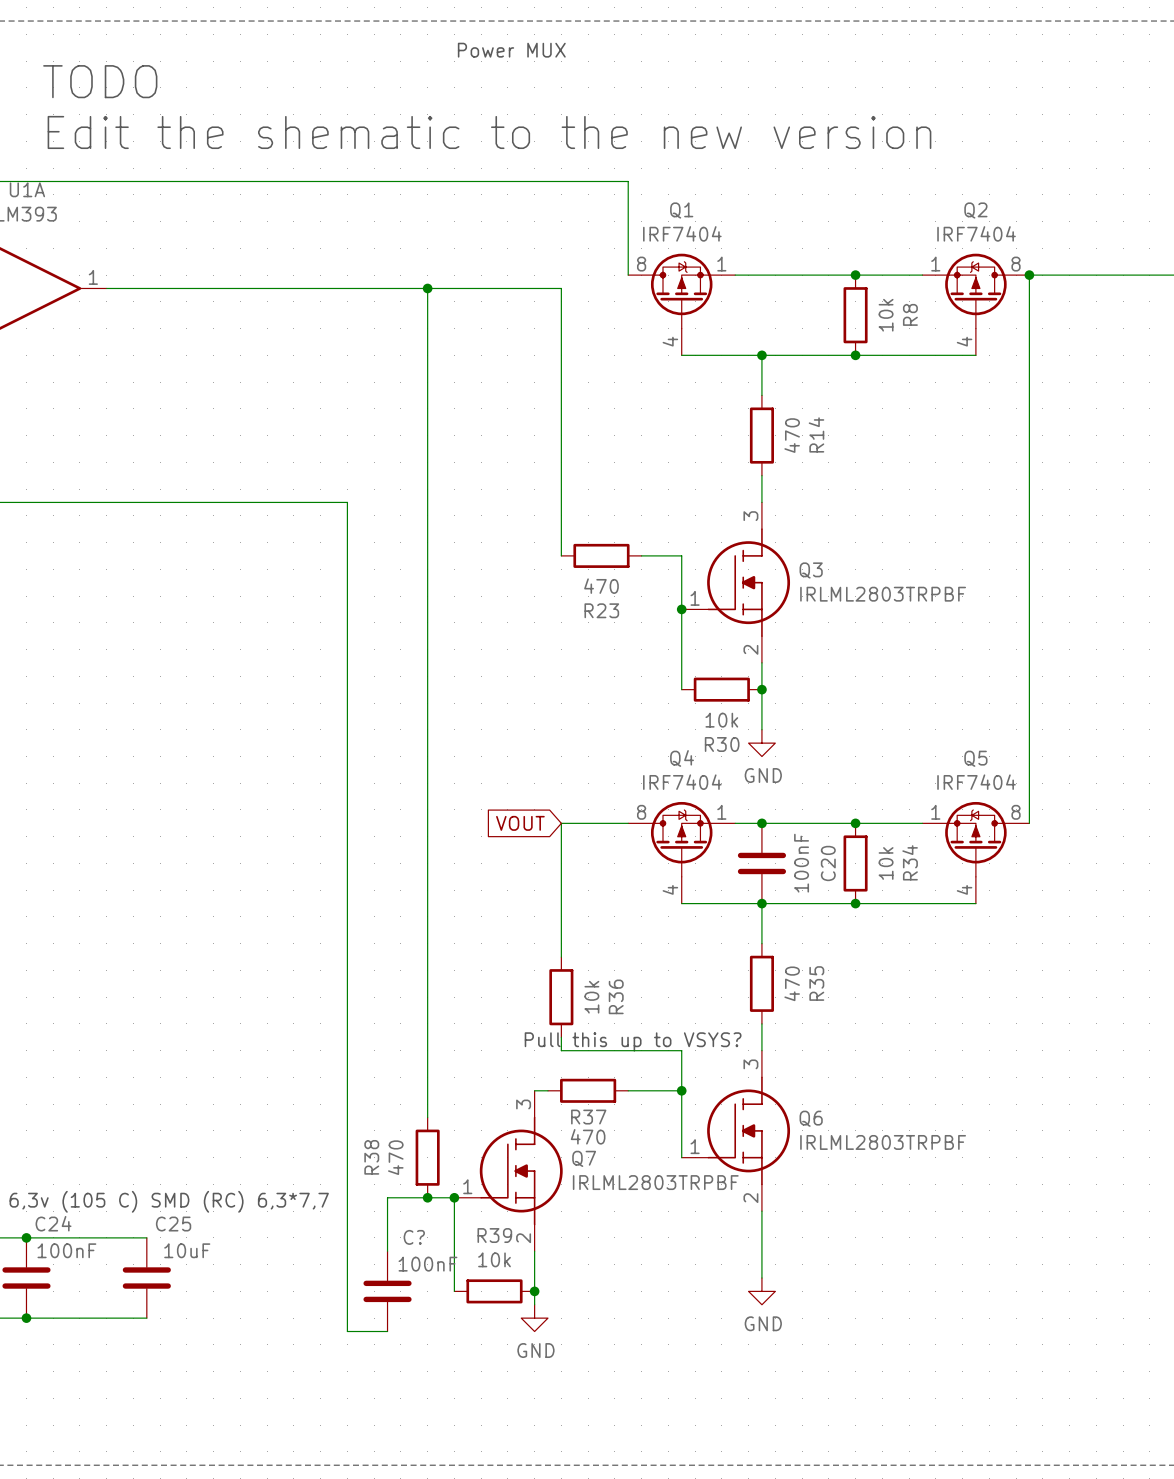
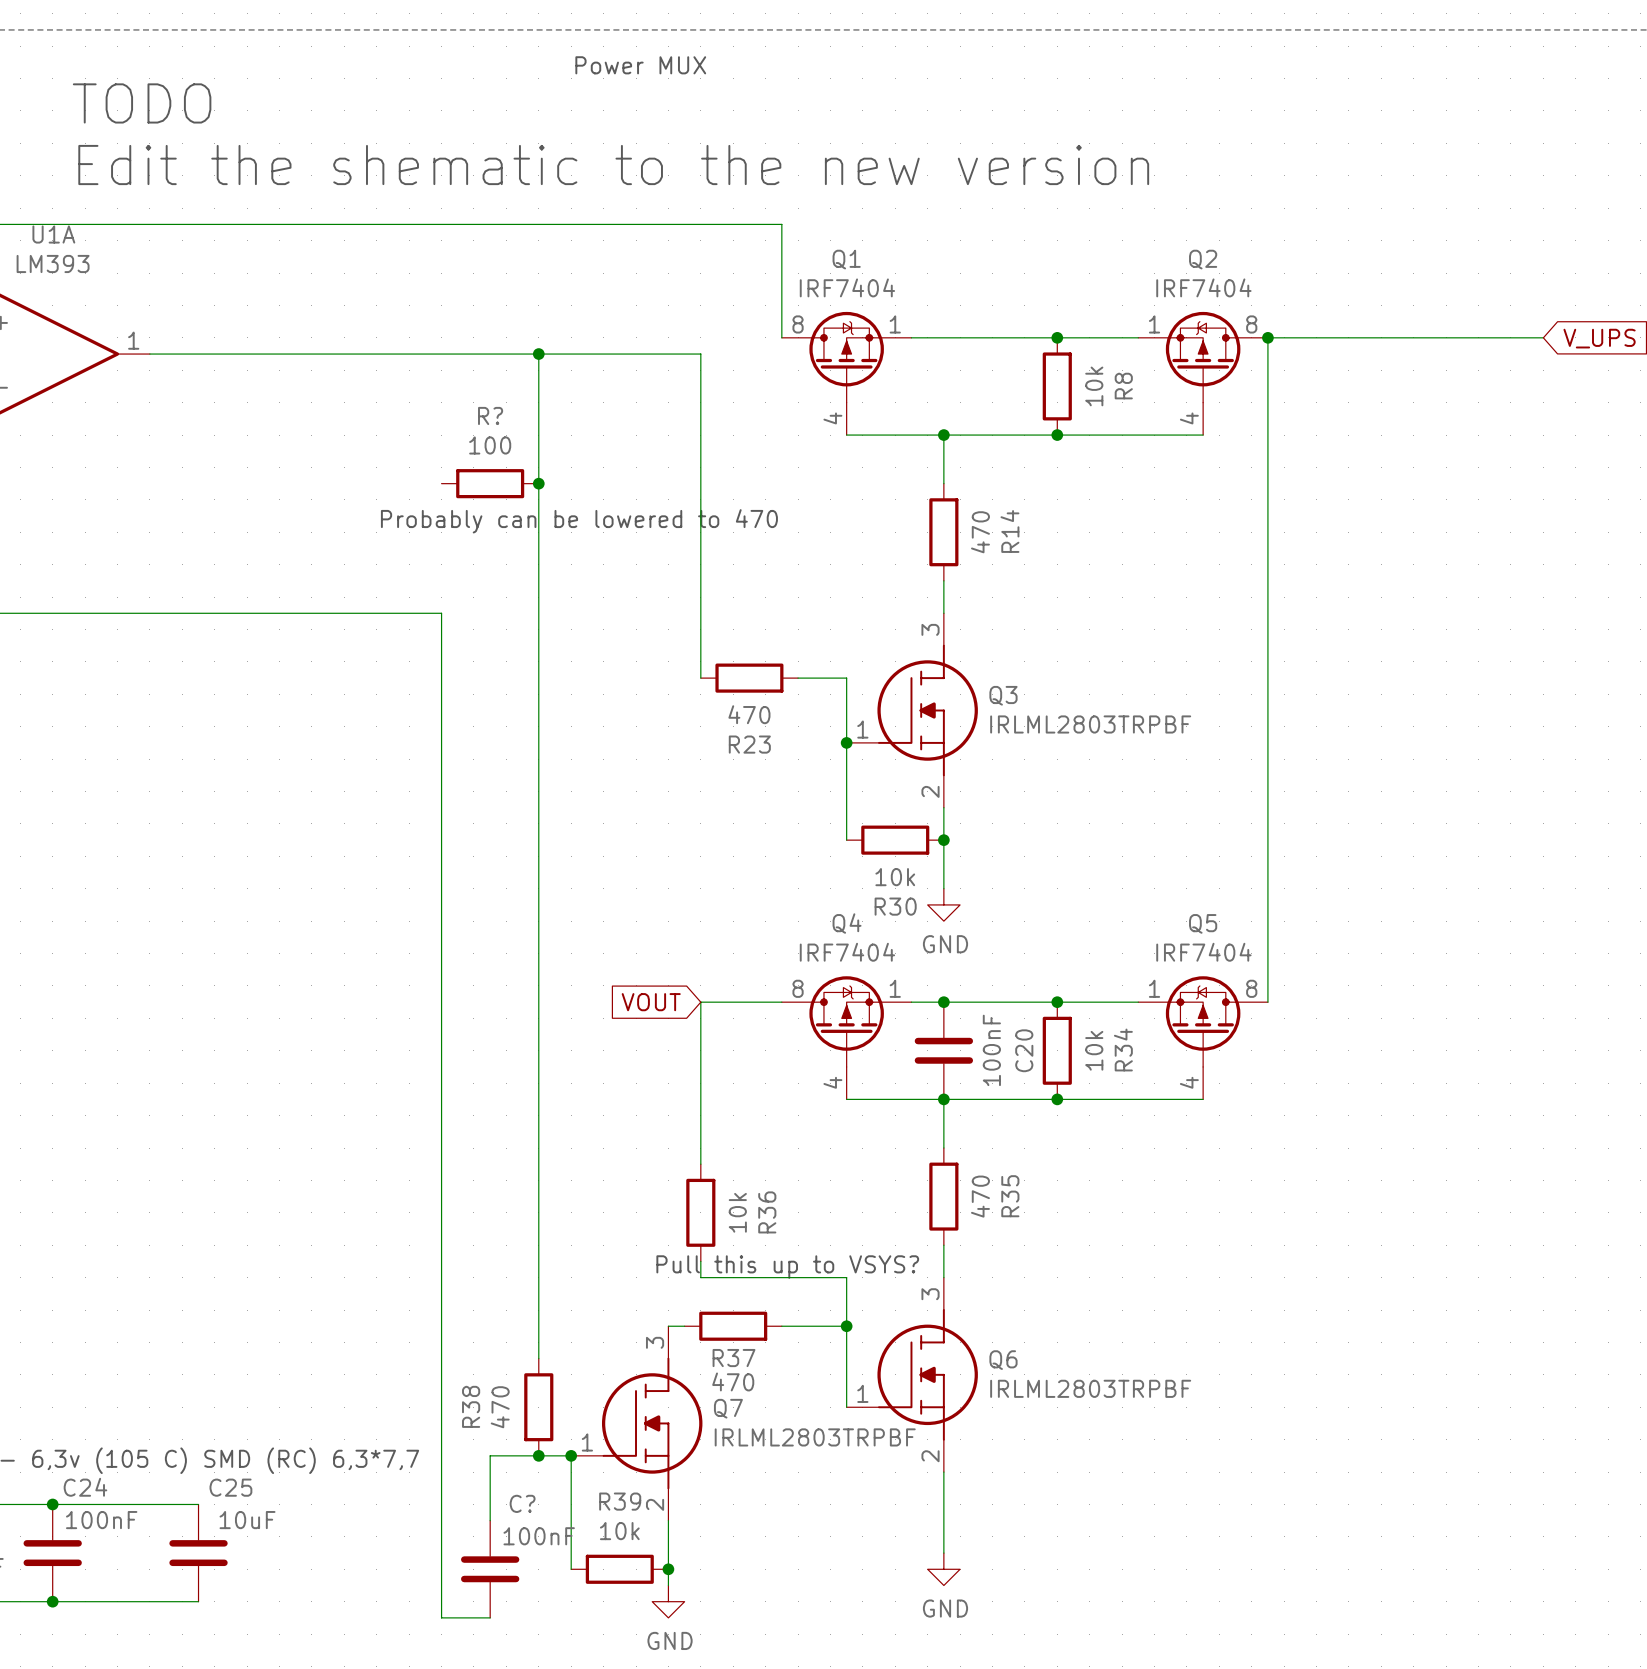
R?: none -> 100 (490, 483)
junction: none -> (538, 483)
text: none -> Probably can be lowered to 470 (579, 521)

